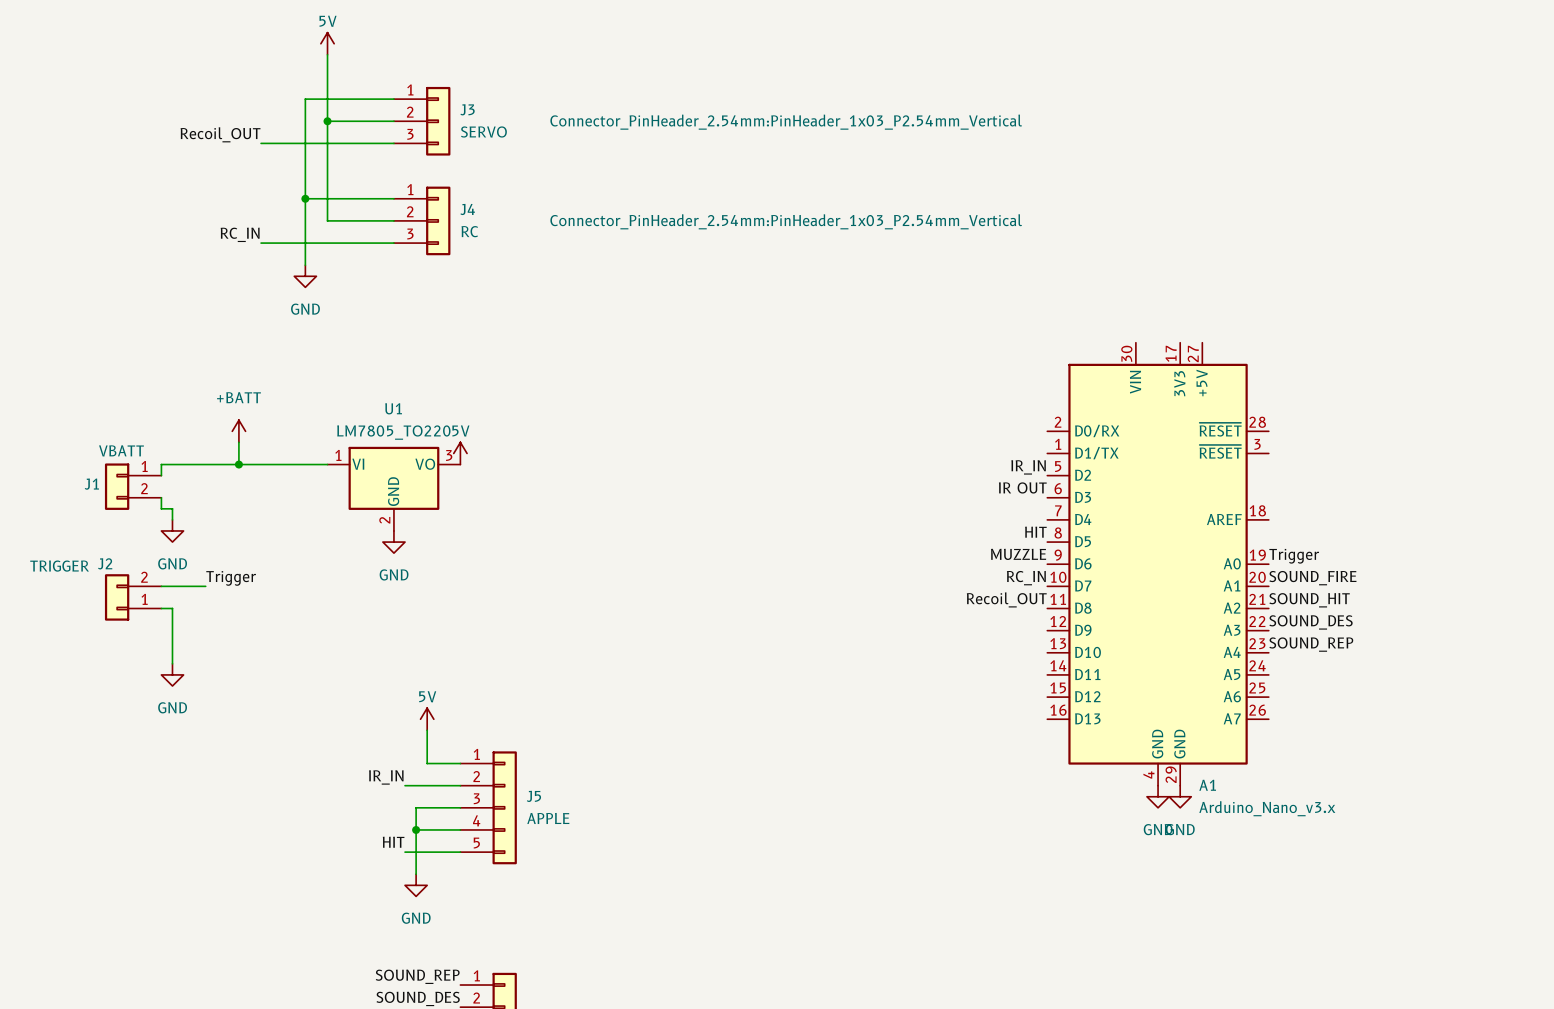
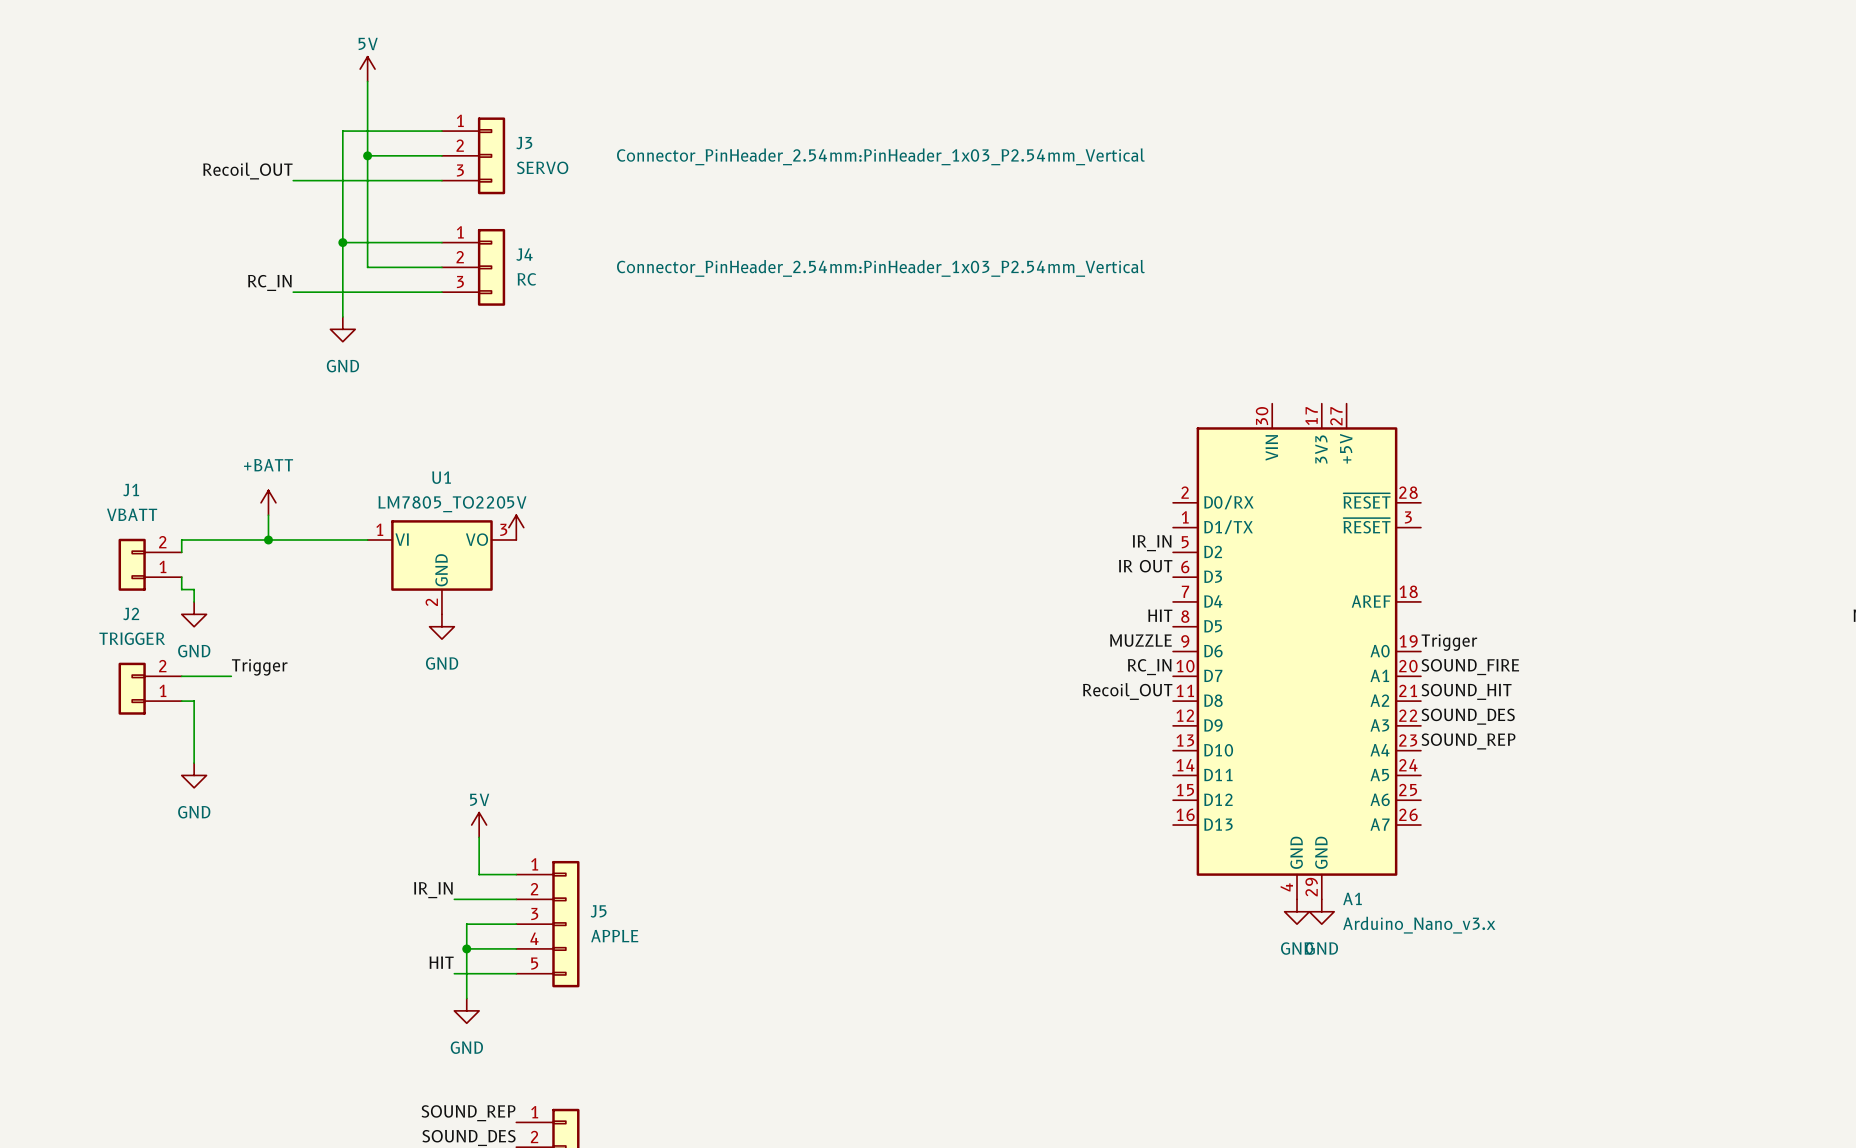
J1 name position: J1 (91, 484) -> J1 (131, 490)
J1 flip: as is (117, 486) -> up-down (132, 564)
J2 name position: J2 (105, 563) -> J2 (131, 613)
J2 value position: TRIGGER (59, 566) -> TRIGGER (132, 638)

